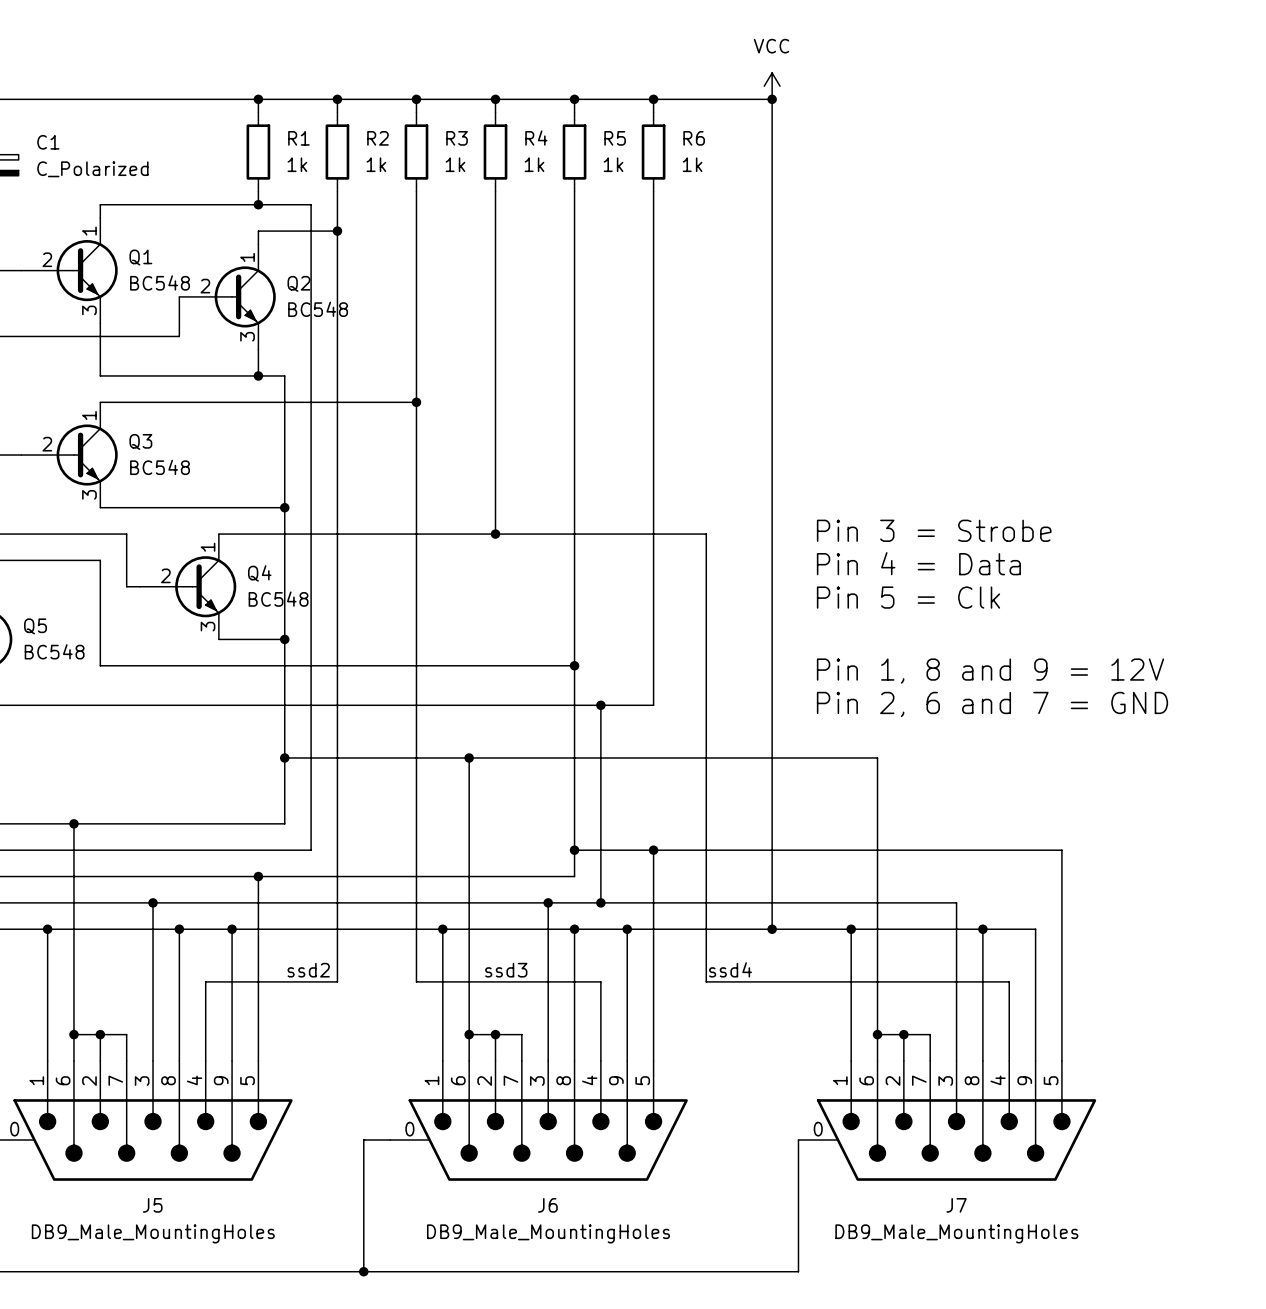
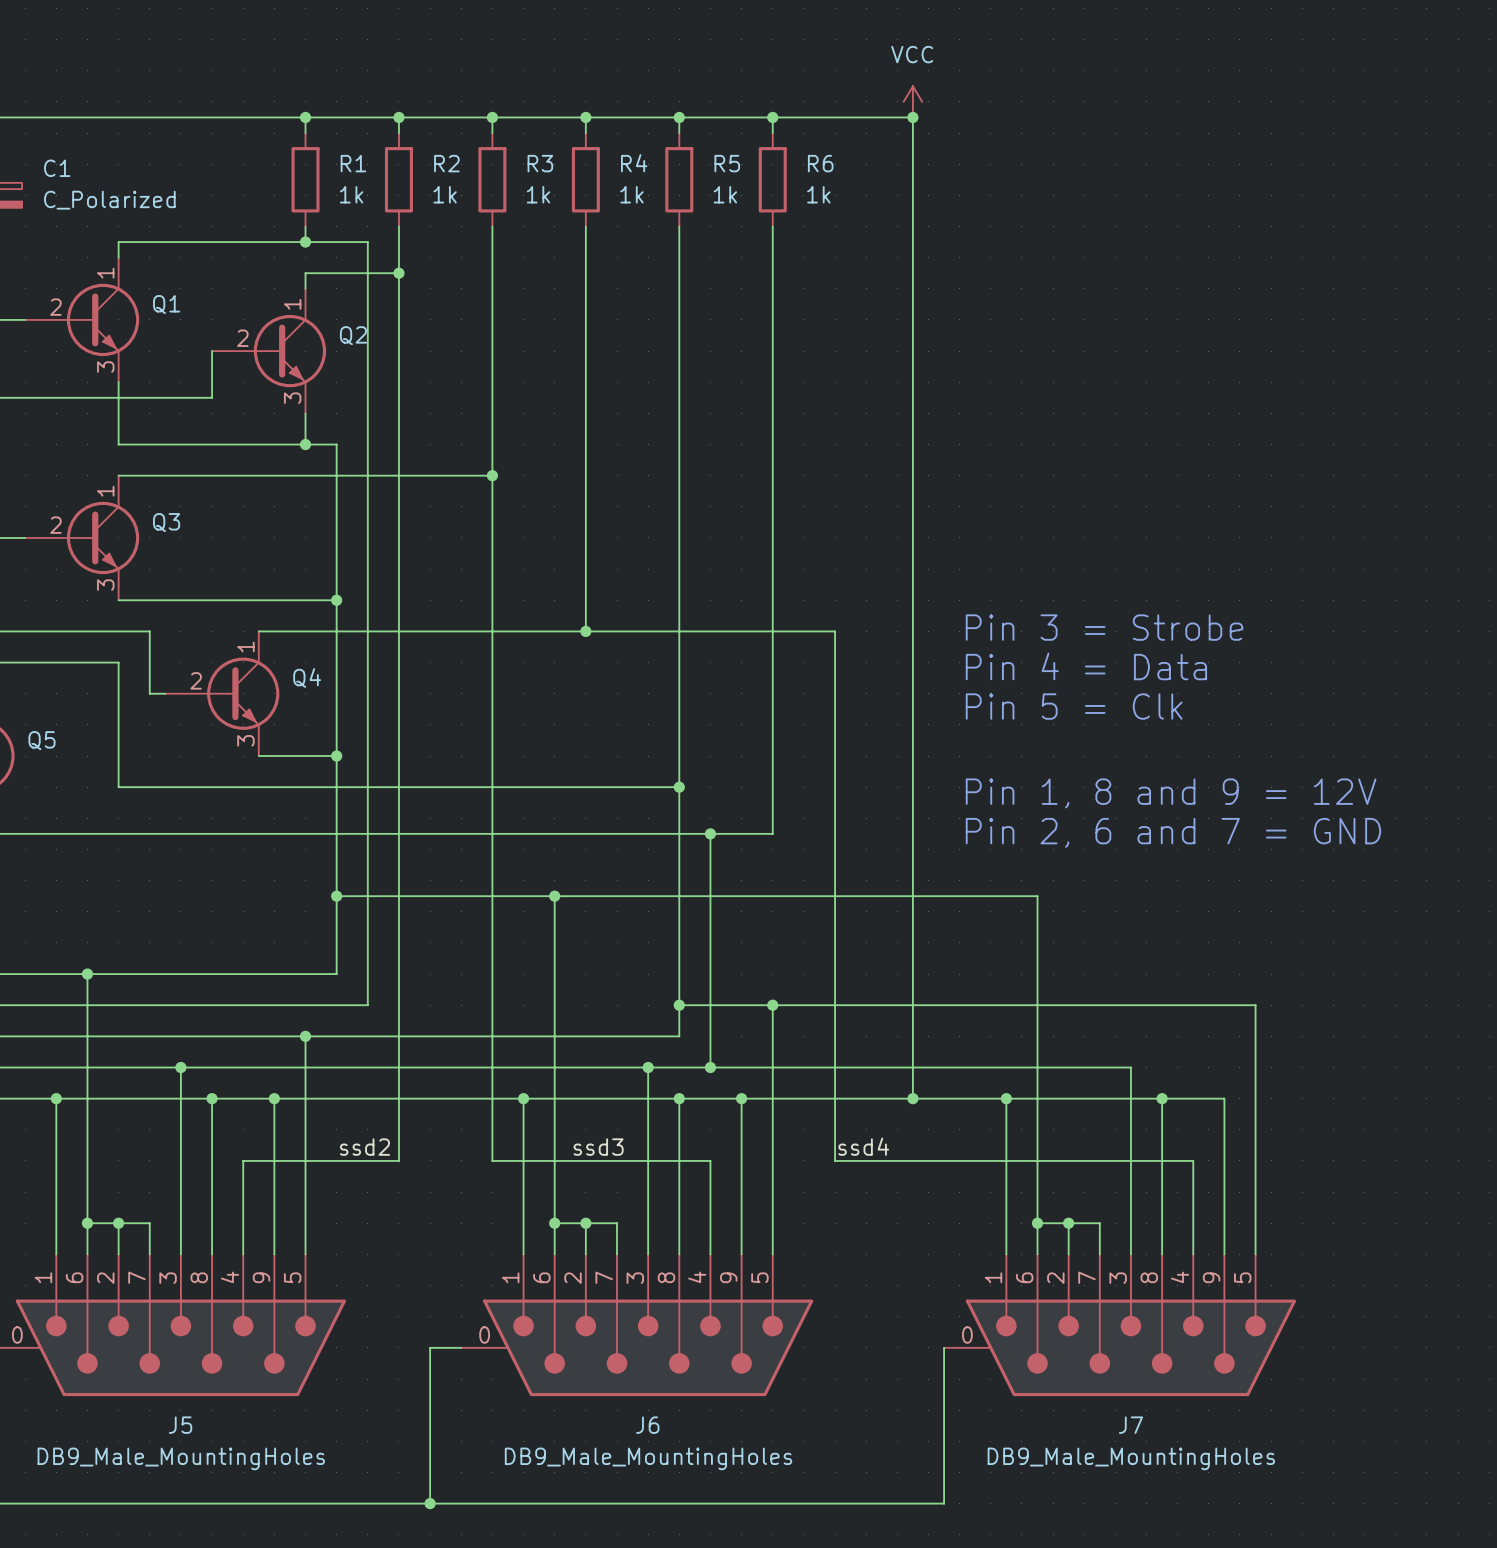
Q1 value: BC548 (160, 282) -> none
Q2 value: BC548 (318, 309) -> none
Q3 value: BC548 (160, 467) -> none
Q4 value: BC548 (278, 599) -> none
Q5 value: BC548 (54, 651) -> none

